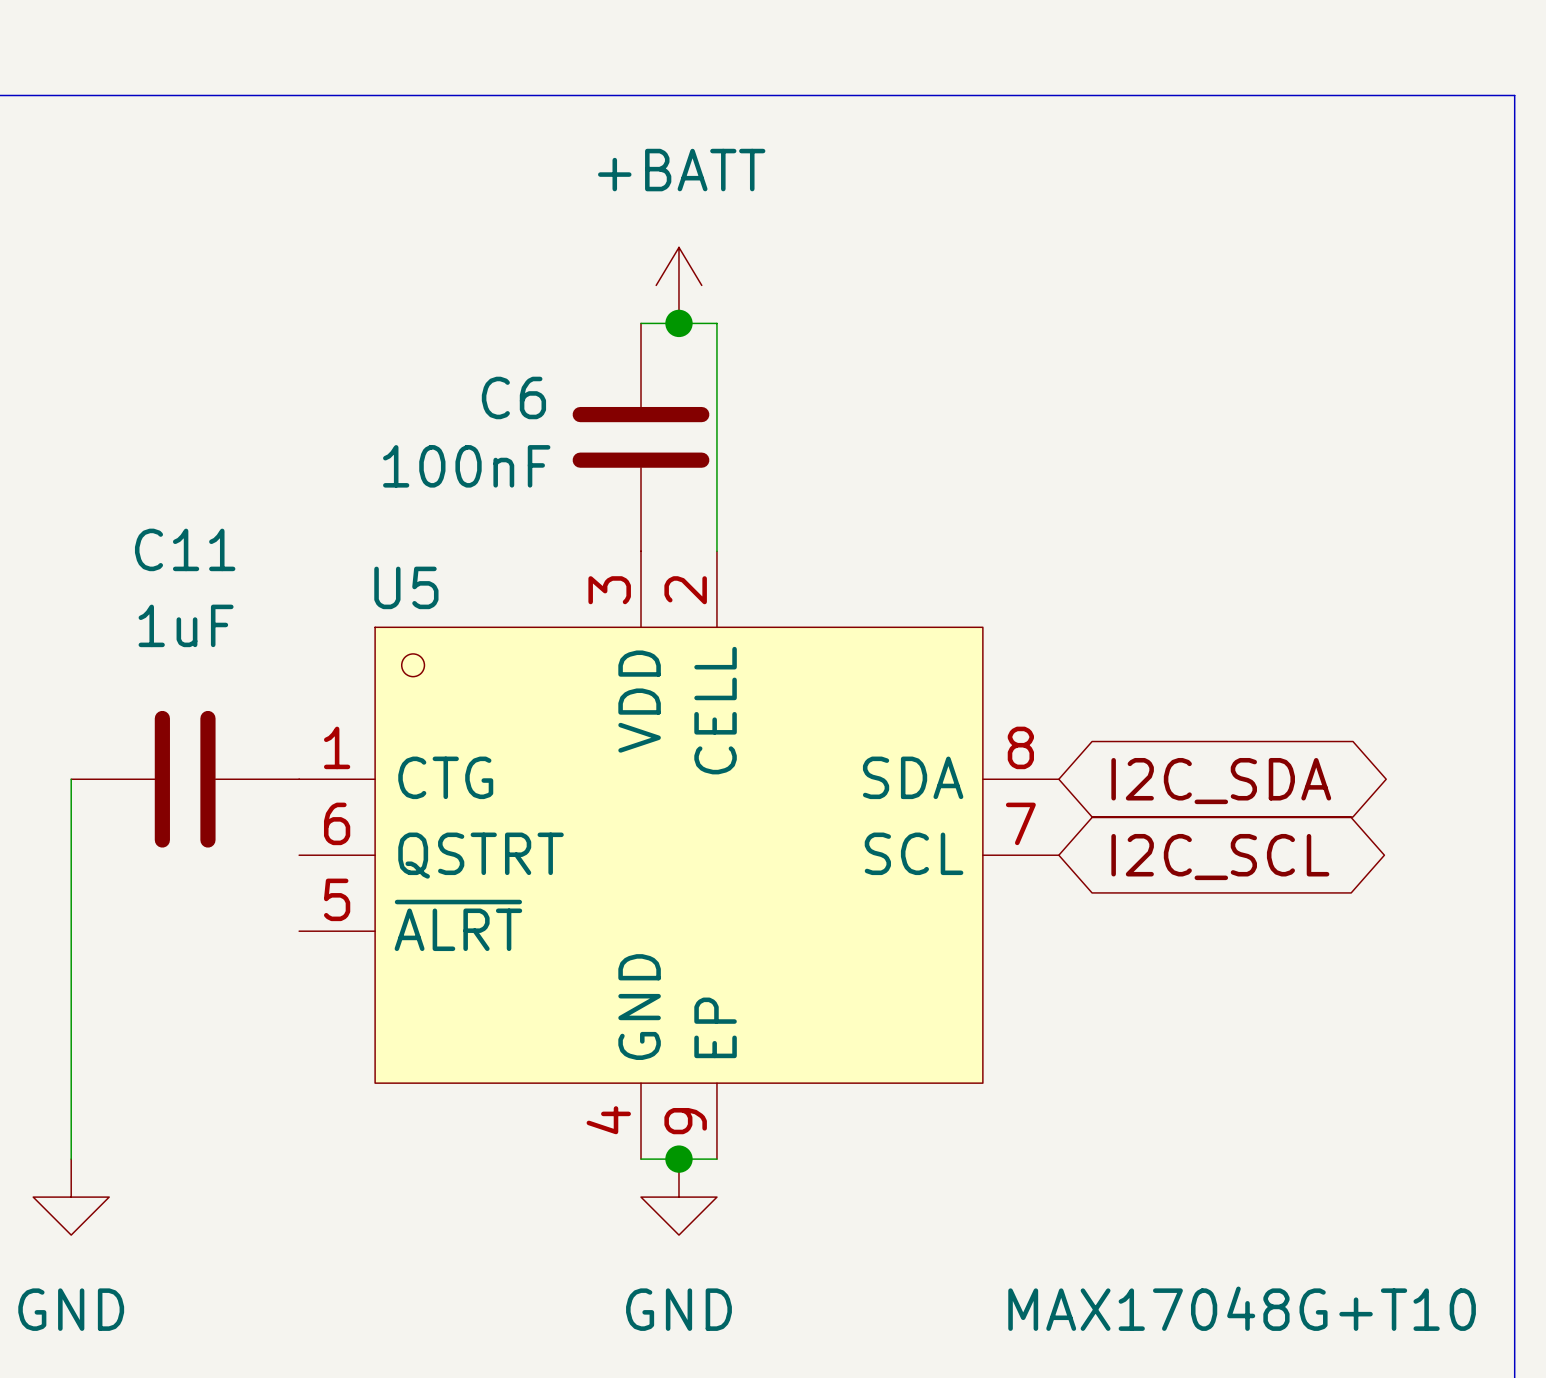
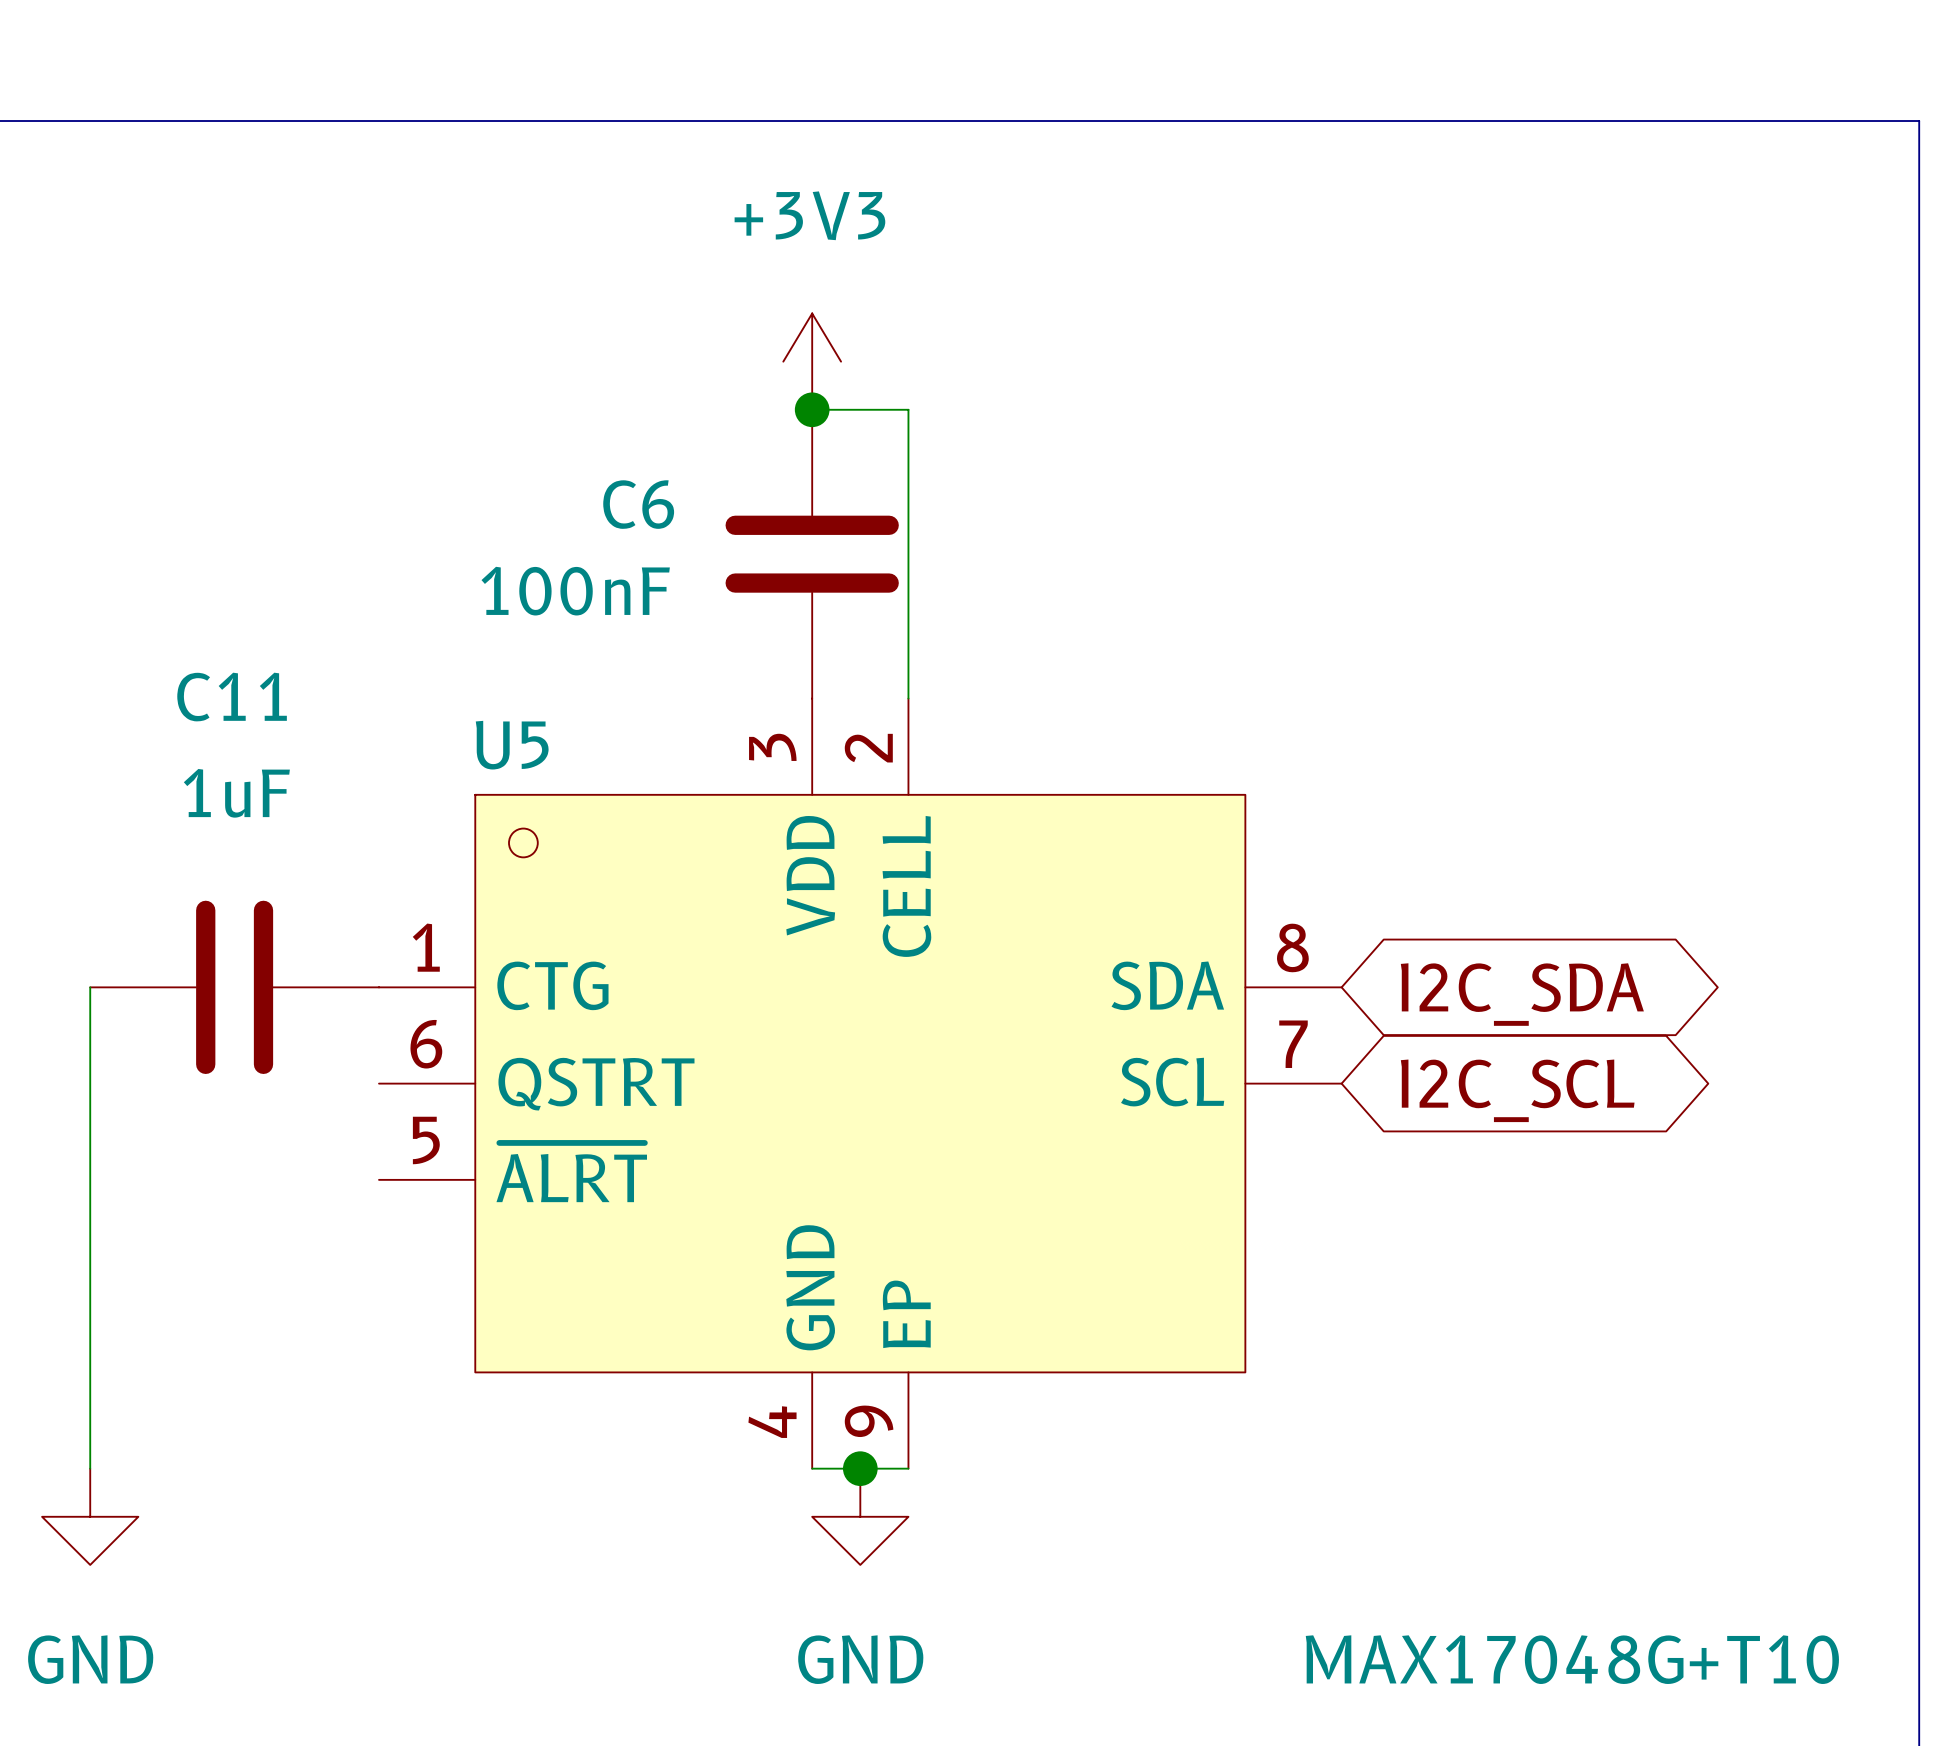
power symbol: none -> +3V3 (812, 361)
power symbol: +BATT (678, 285) -> none
junction position: (678, 323) -> (812, 409)

